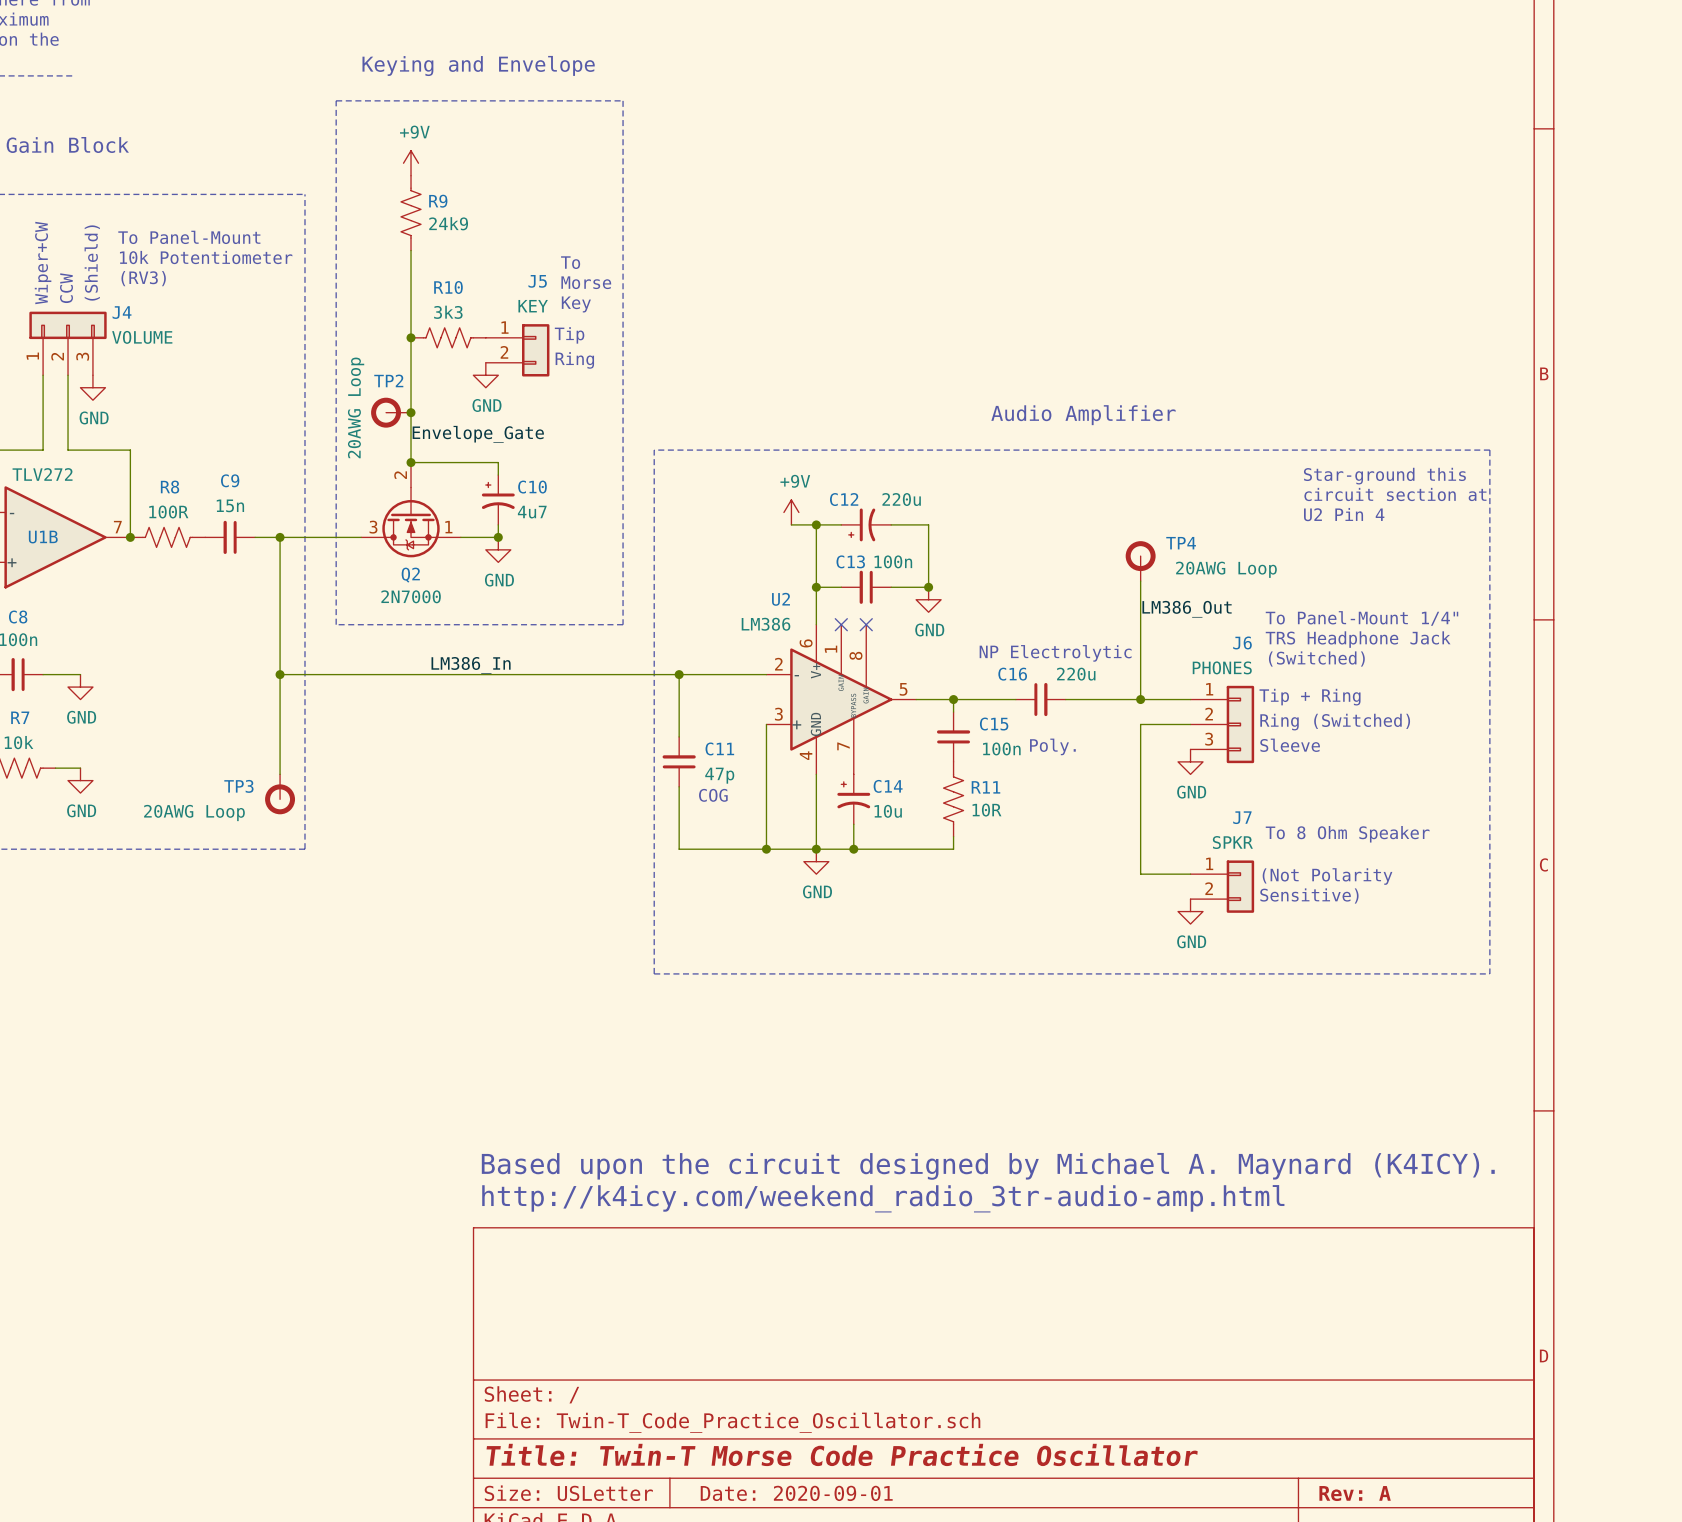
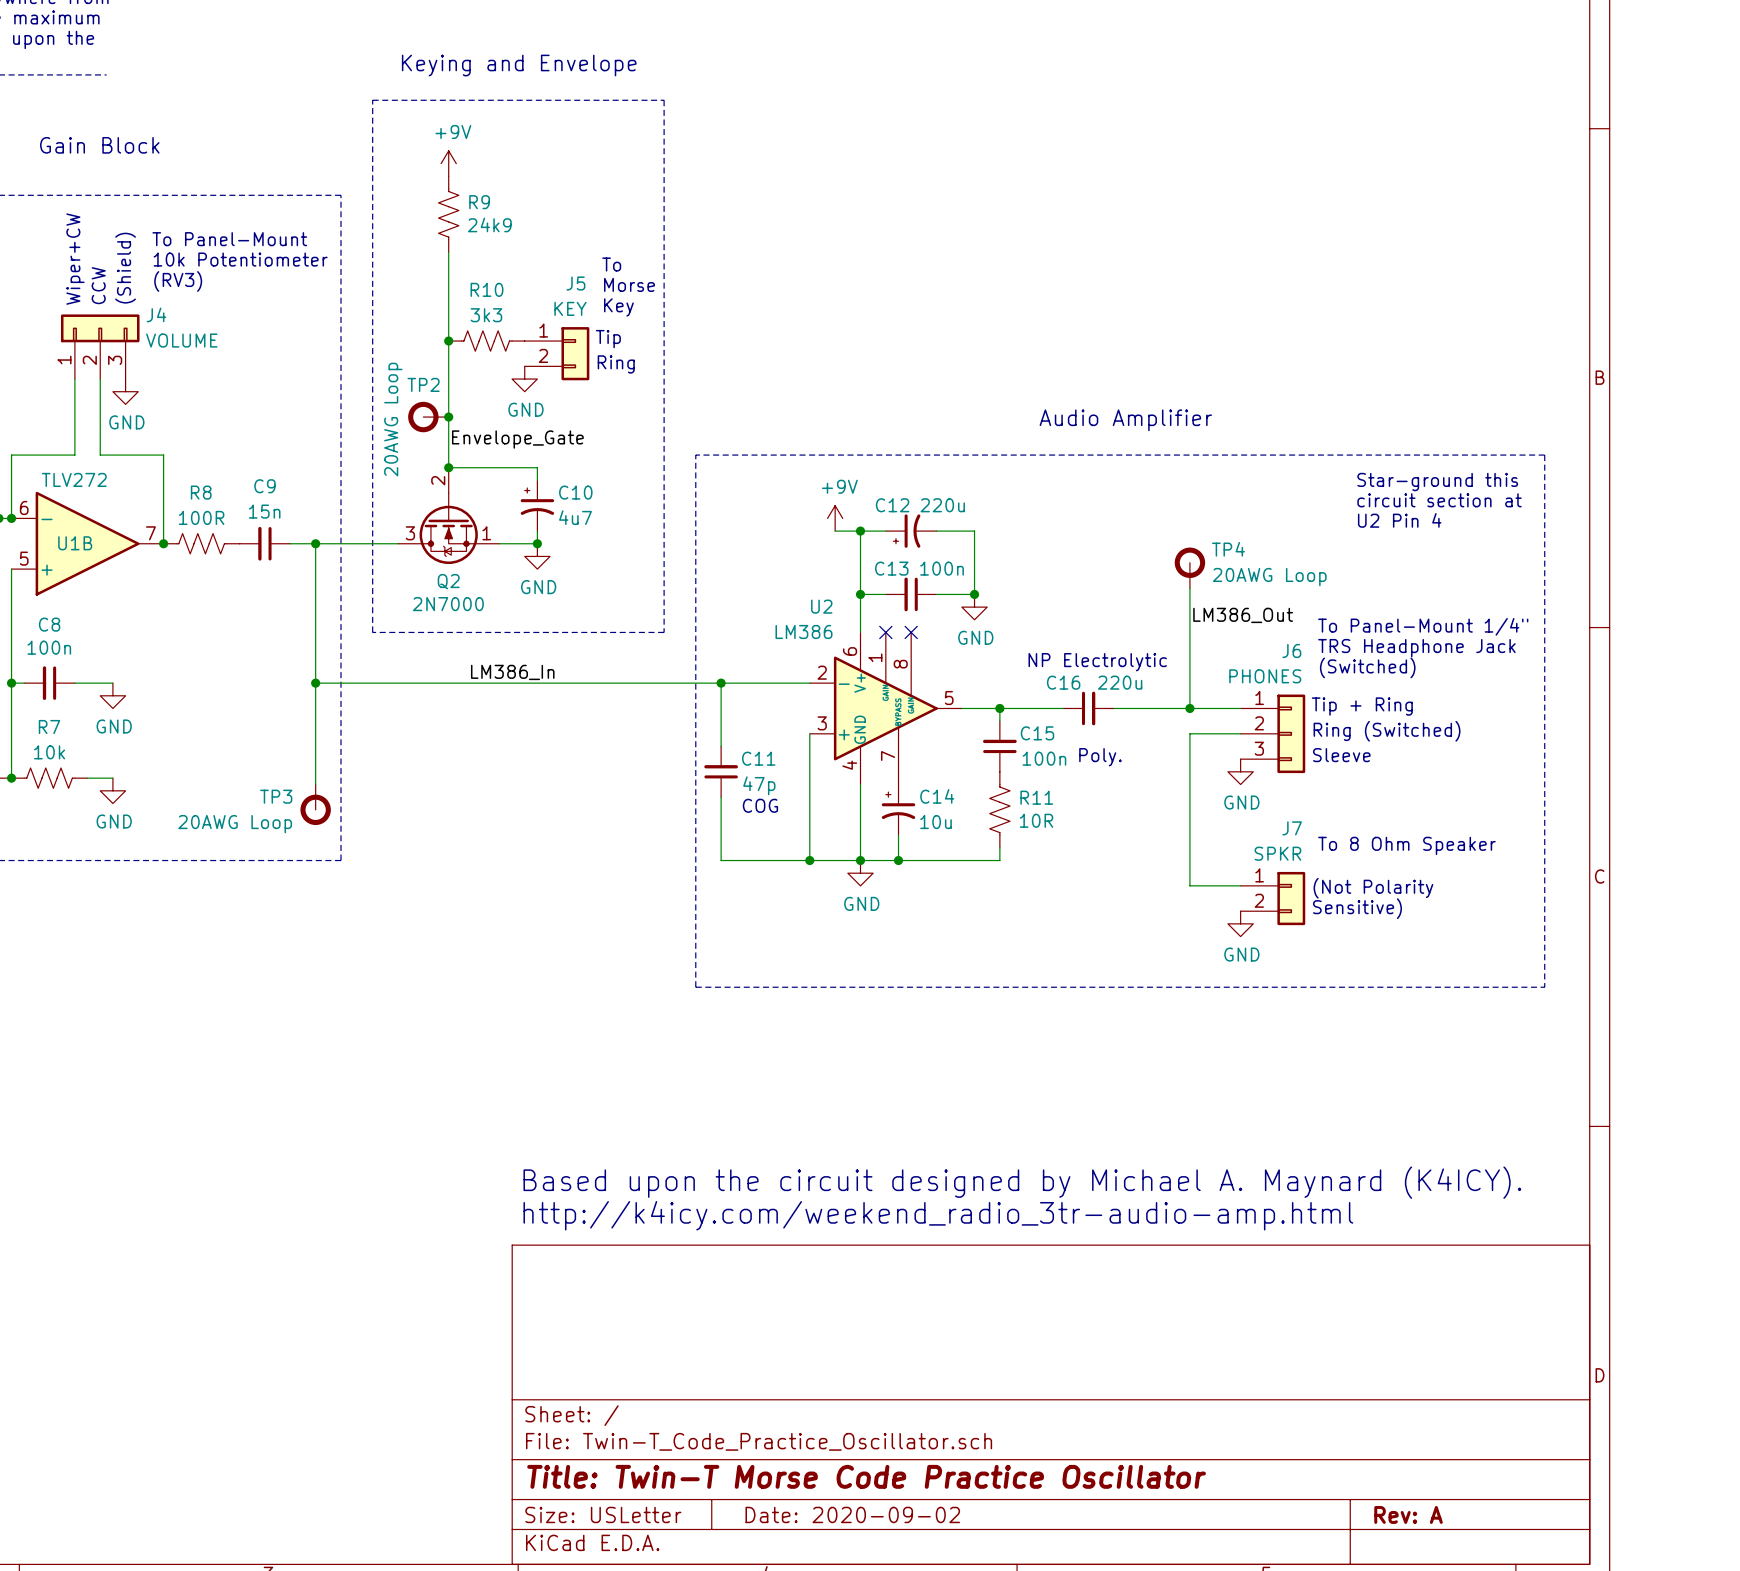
title block: Date: 2020-09-01 (796, 1493) -> Date: 2020-09-02 (852, 1514)

